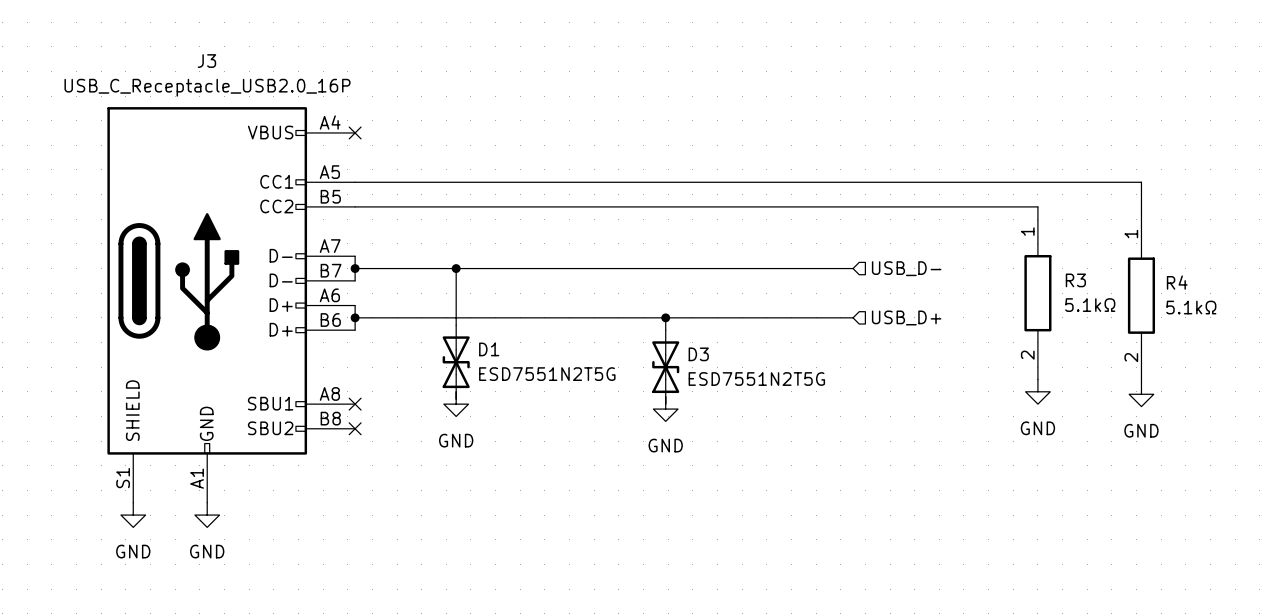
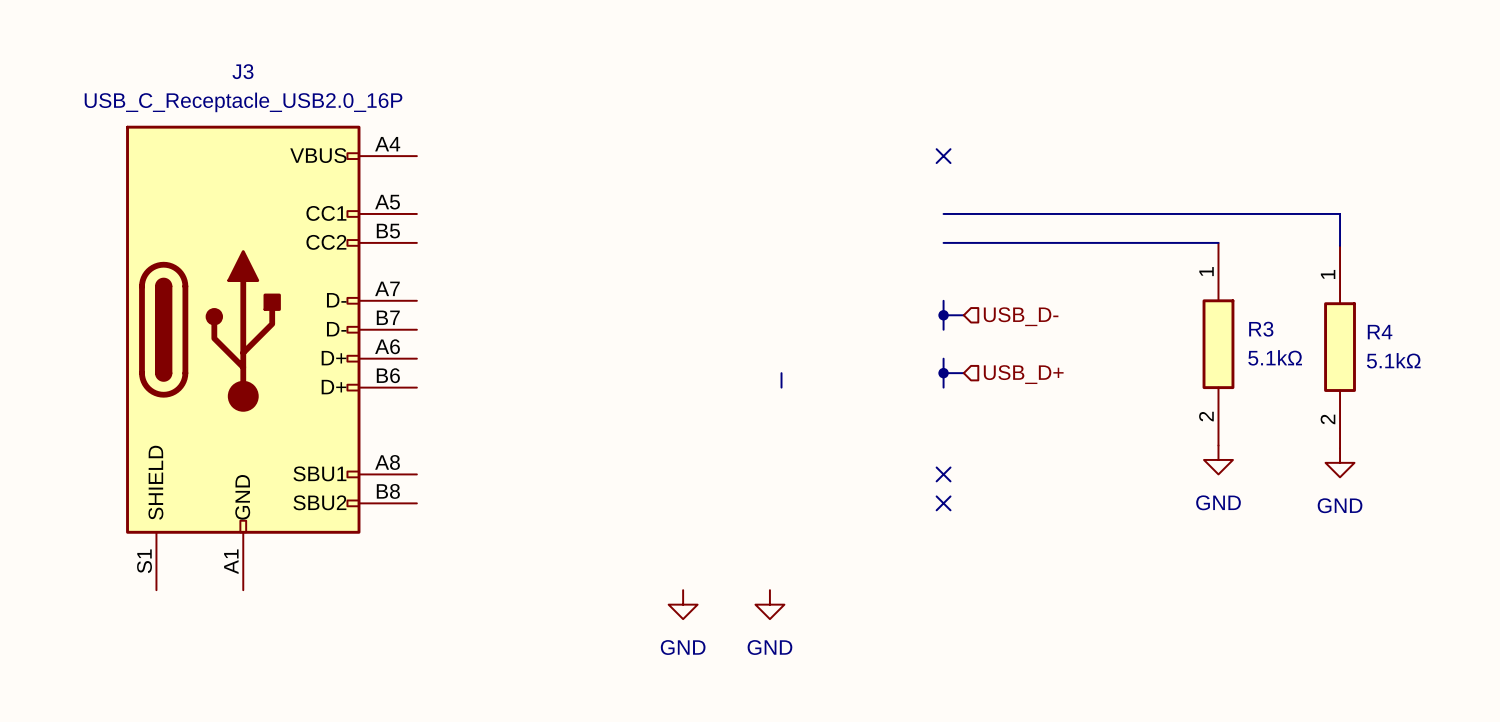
no-connect mark: (355, 132) -> none
no-connect mark: none -> (943, 156)
wire: (355, 182) (803, 182) -> none
wire: (355, 206) (803, 206) -> none
wire: (355, 256) (355, 280) -> none
wire: none -> (943, 300) (943, 329)
wire: (355, 268) (803, 268) -> none
junction: (355, 268) -> none
wire: (456, 268) (456, 325) -> none
junction: (456, 268) -> none
junction: none -> (943, 315)
wire: (821, 268) (853, 268) -> none
hierarchical label position: USB_D- (906, 268) -> USB_D- (1021, 316)
wire: (355, 305) (355, 330) -> none
wire: none -> (943, 358) (943, 387)
wire: (355, 317) (803, 317) -> none
junction: (355, 317) -> none
junction: (665, 317) -> none
junction: none -> (943, 373)
wire: (821, 317) (853, 317) -> none
hierarchical label position: USB_D+ (906, 317) -> USB_D+ (1023, 374)
D1: ESD7551N2T5G (456, 362) -> none
D3: ESD7551N2T5G (665, 367) -> none
no-connect mark: (355, 404) -> none
power symbol: GND (456, 404) -> none
no-connect mark: none -> (943, 474)
power symbol: GND (665, 409) -> none
no-connect mark: (355, 428) -> none
no-connect mark: none -> (943, 503)
power symbol: GND (133, 515) -> none
power symbol: GND (207, 515) -> none
power symbol: none -> GND (683, 604)
power symbol: none -> GND (769, 604)

